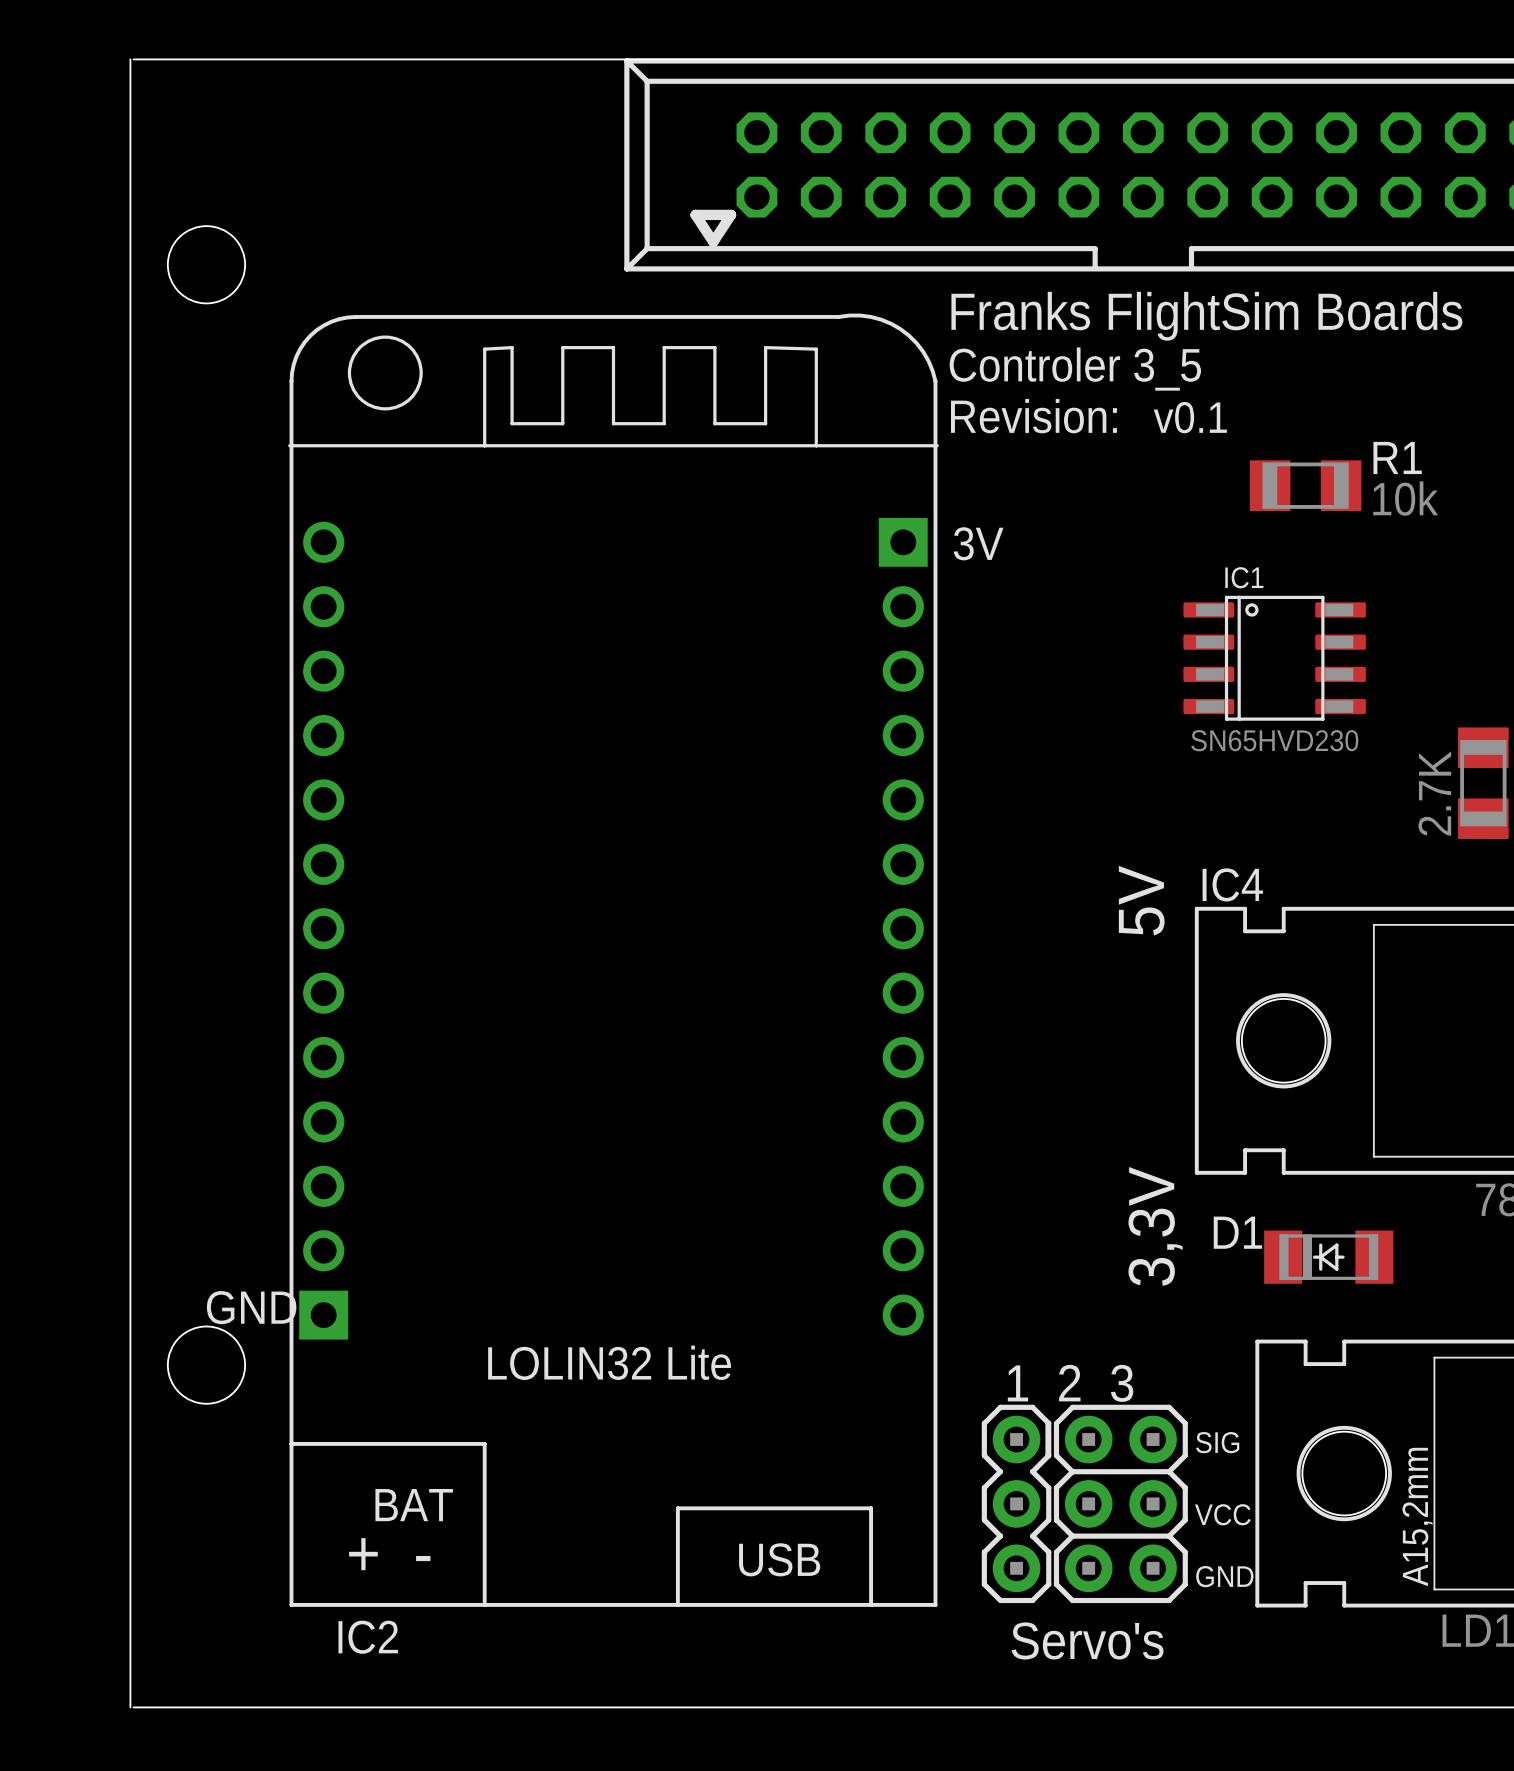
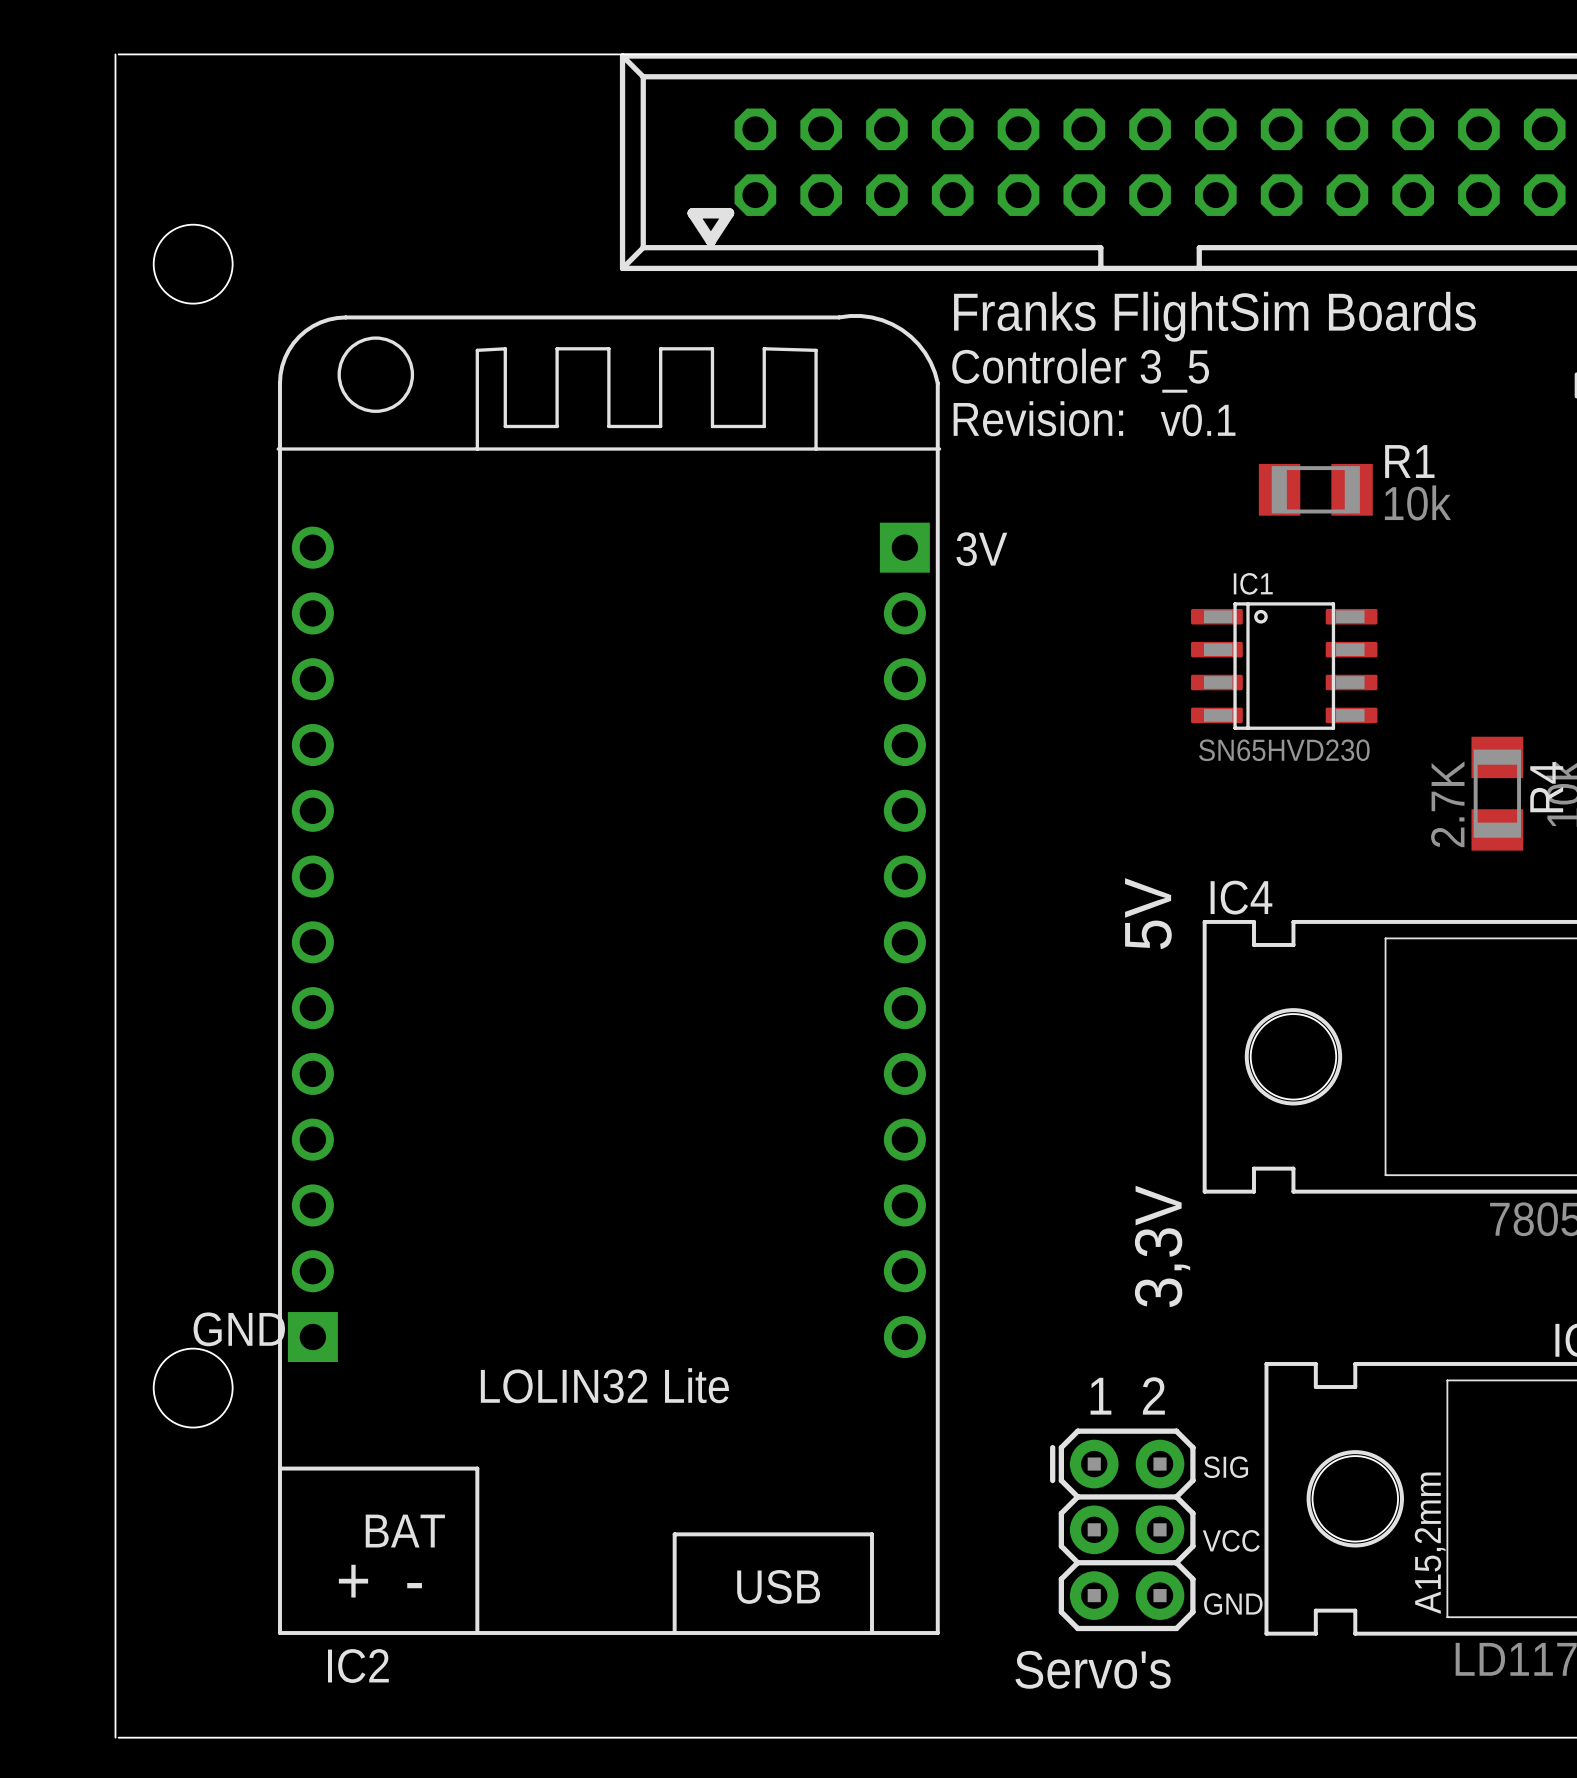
D1: (1328, 1257) -> none
text: 1 2 3 (1070, 1383) -> 1 2 (1127, 1395)
part: (1016, 1503) -> none

